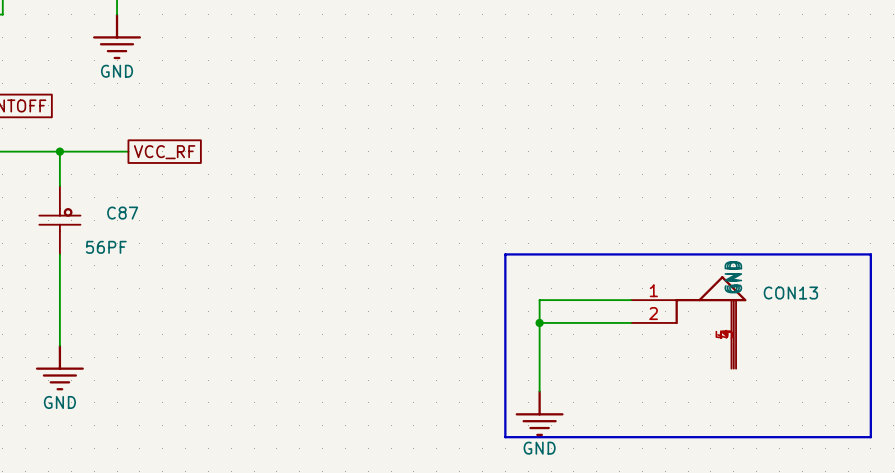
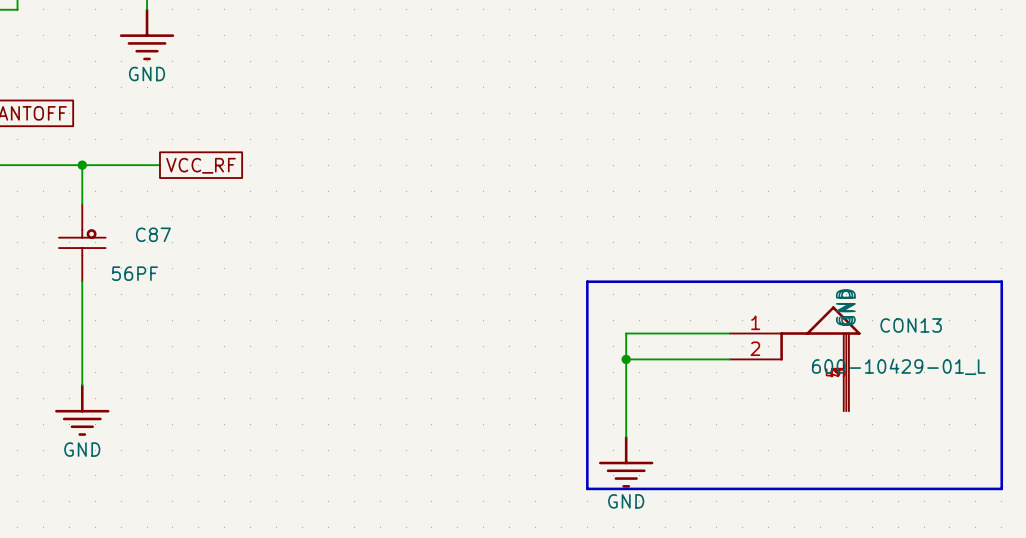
CON13 value: none -> 600-10429-01_L (898, 366)

